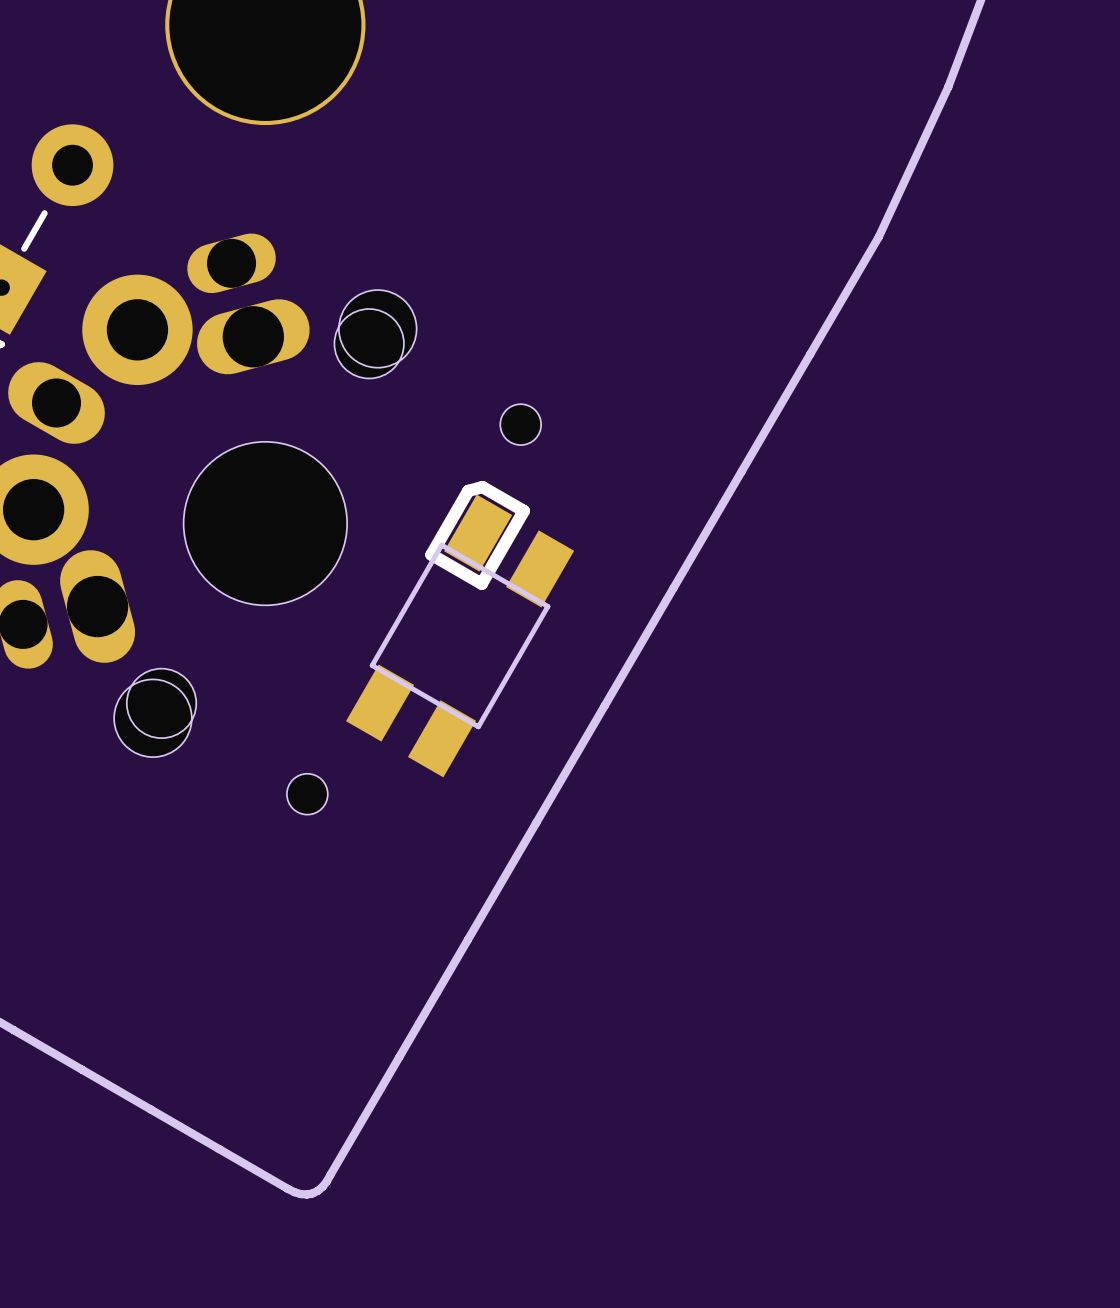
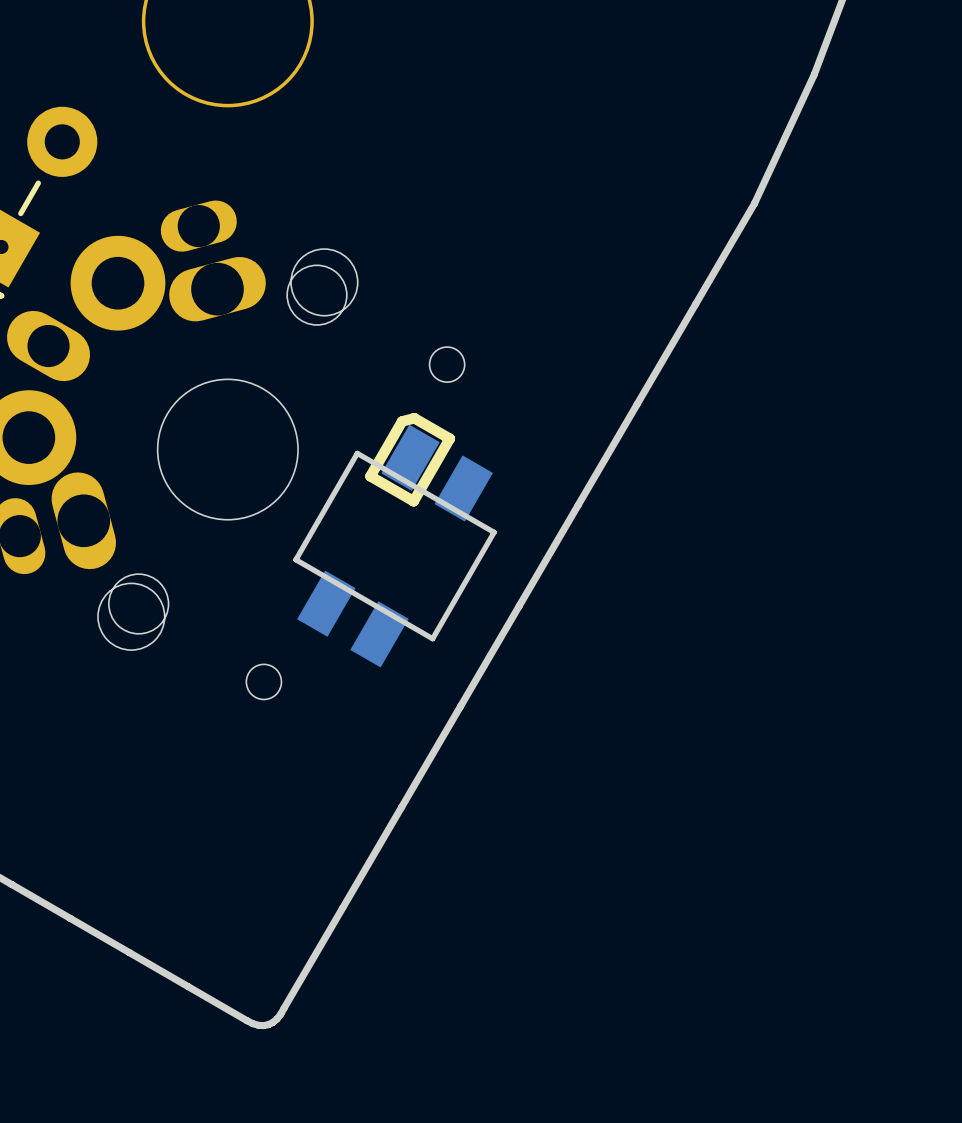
part footprint: [345, 480, 575, 778] -> [297, 412, 493, 668]
board edge: none -> (357, 453) (494, 532) (432, 638) (295, 559) (357, 453)

